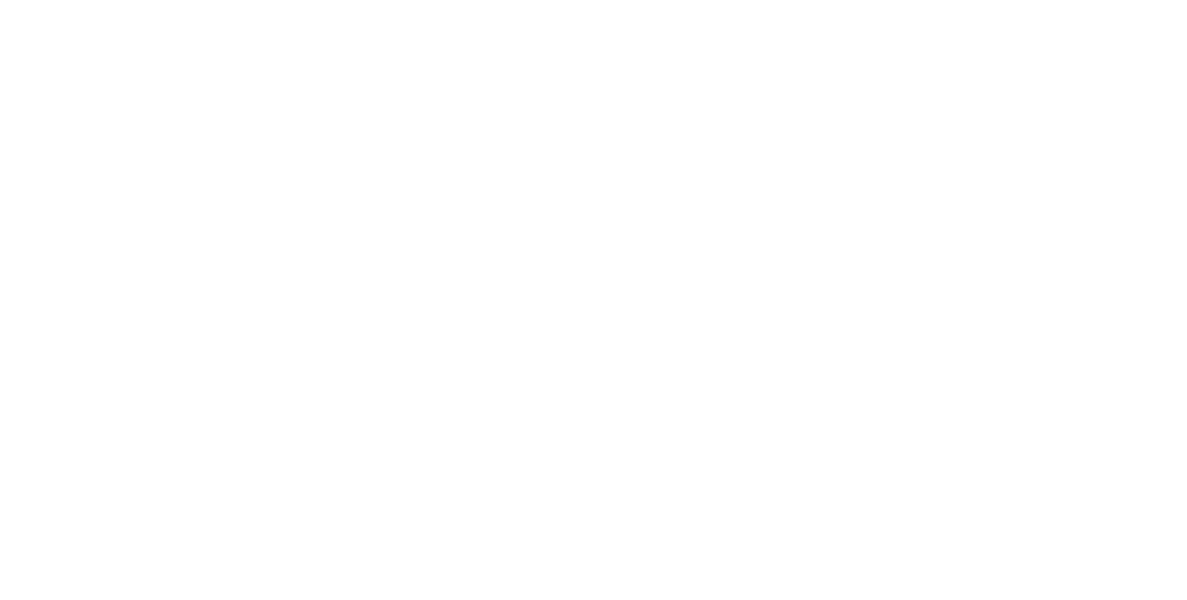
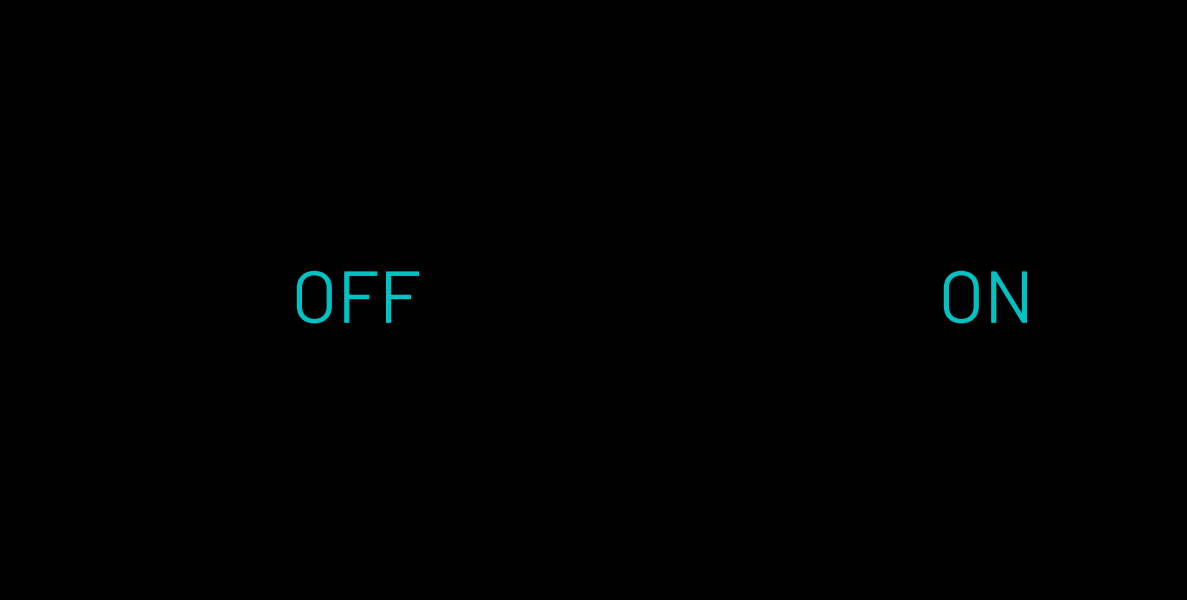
text: none -> OFF (358, 297)
text: none -> ON (985, 297)

